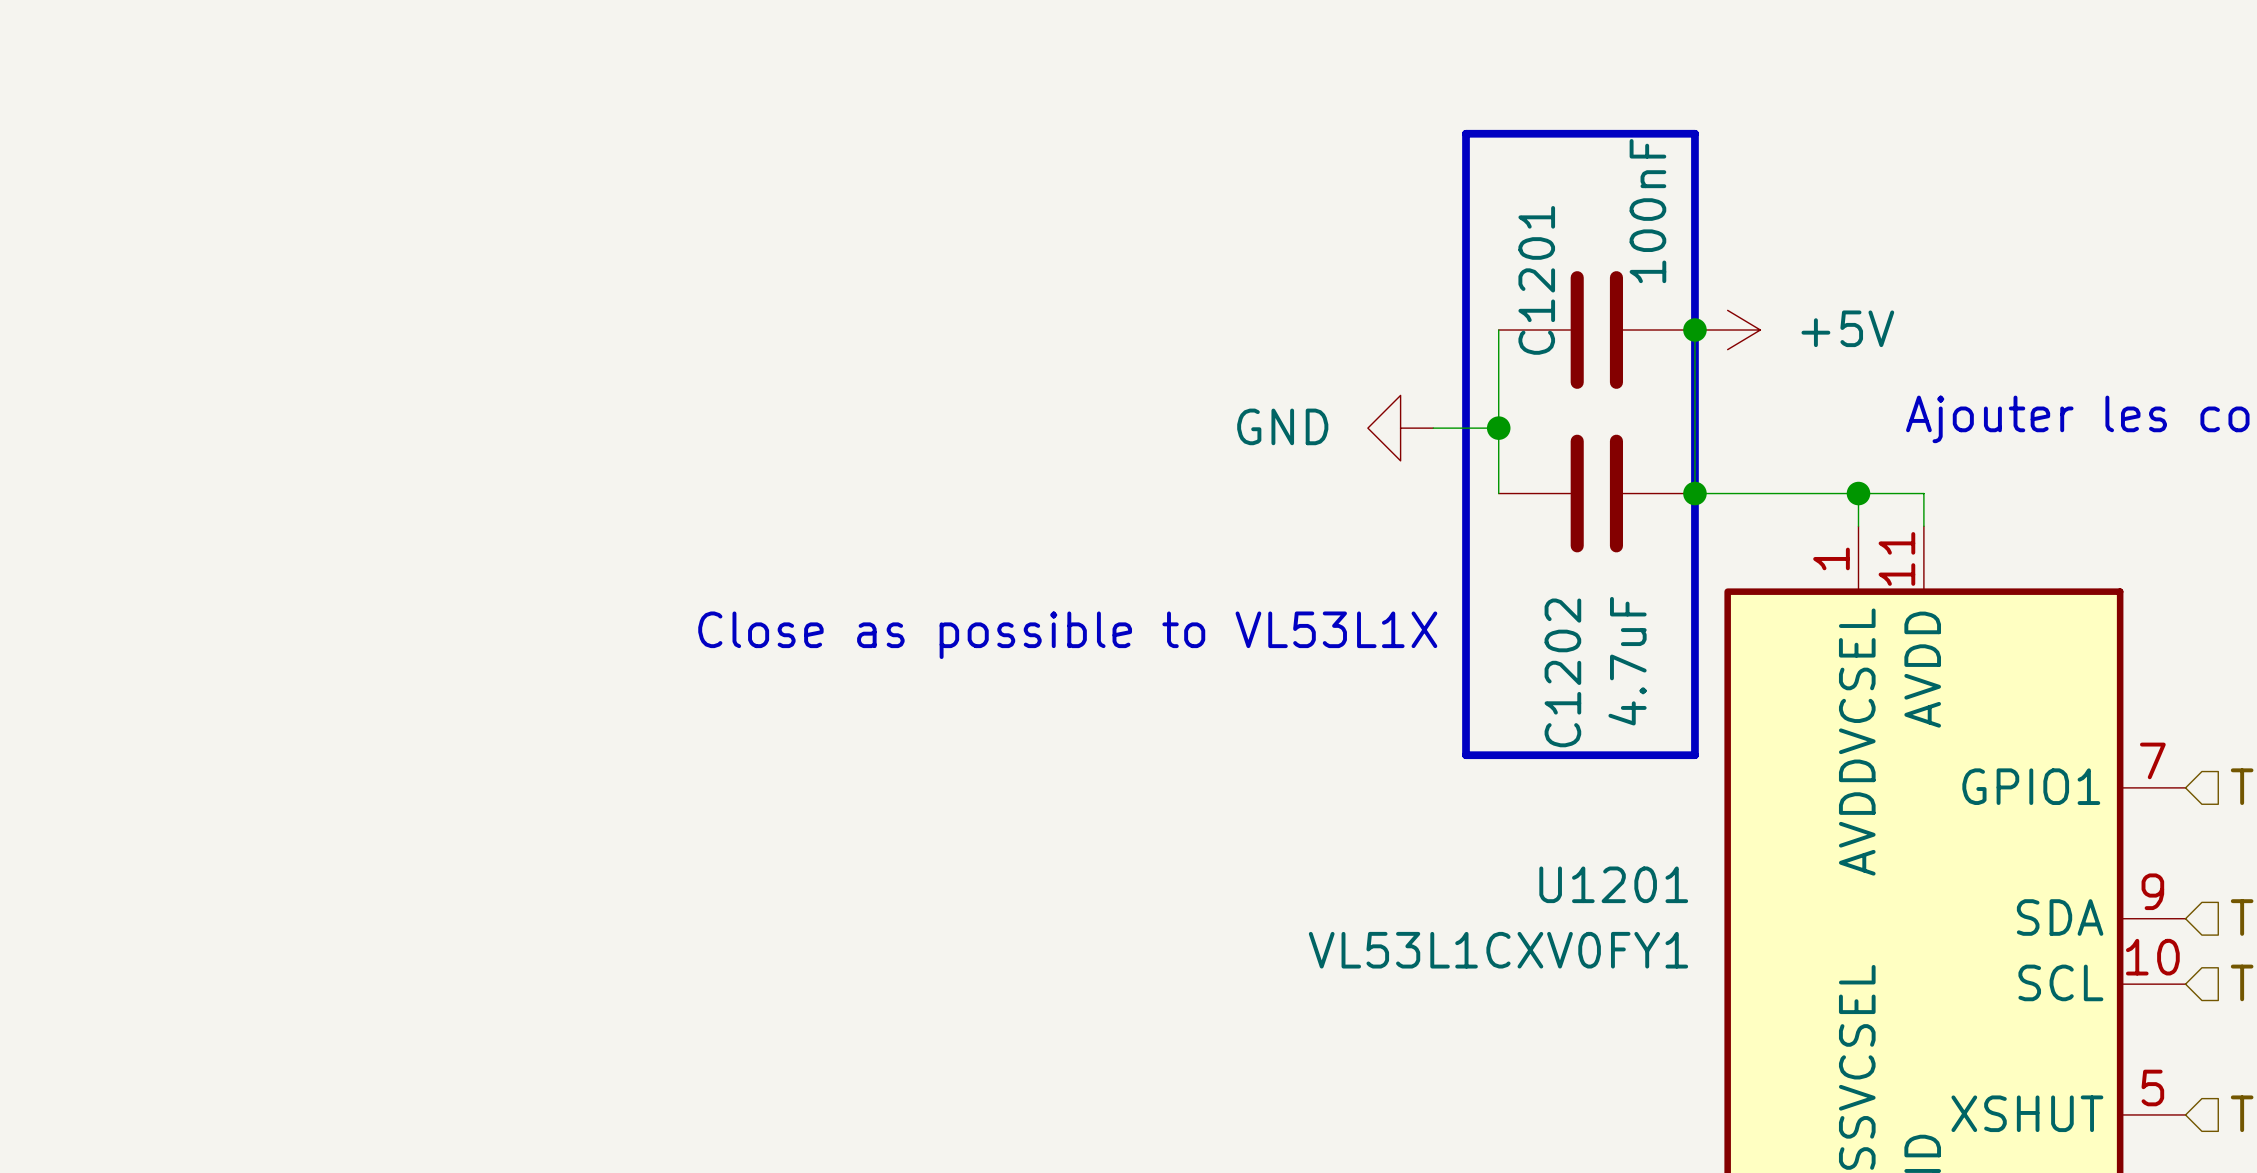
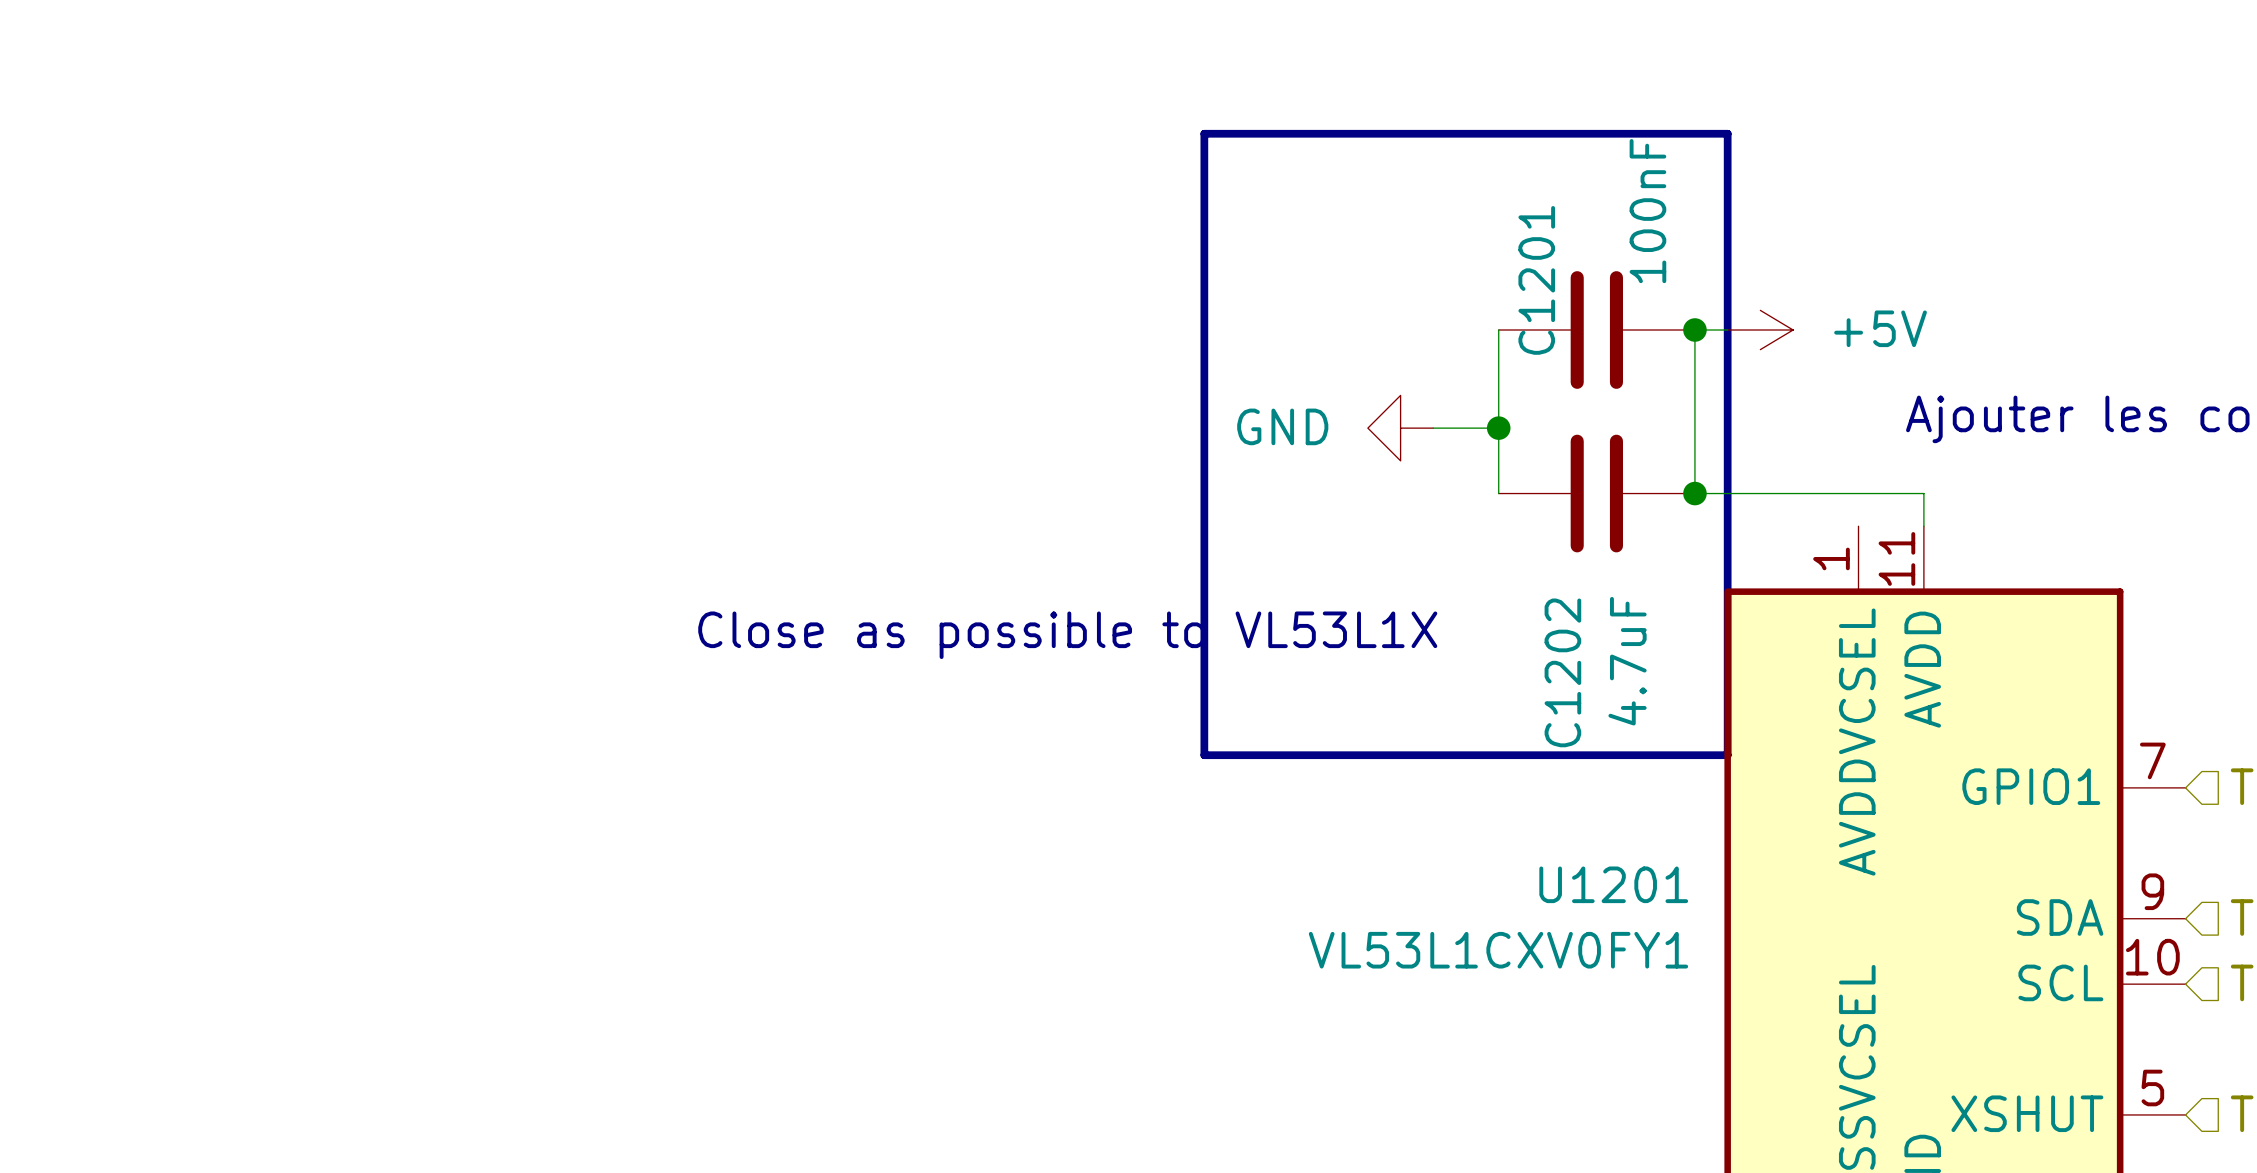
line: (1466, 133) (1466, 755) -> (1466, 133) (1204, 133) (1204, 755) (1466, 755)
line: (1694, 133) (1694, 755) -> (1694, 133) (1727, 133) (1727, 755) (1694, 755)
power symbol position: +5V (1727, 330) -> +5V (1760, 330)
wire: (1858, 493) (1858, 526) -> none
junction: (1858, 493) -> none

